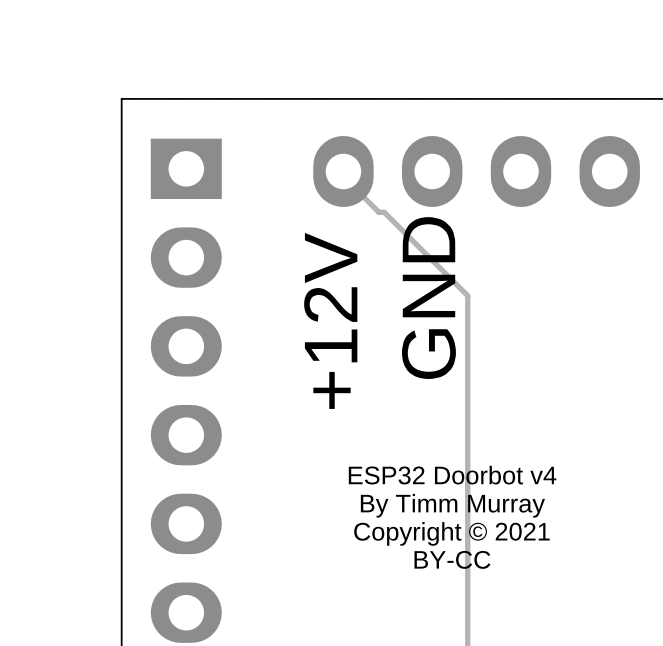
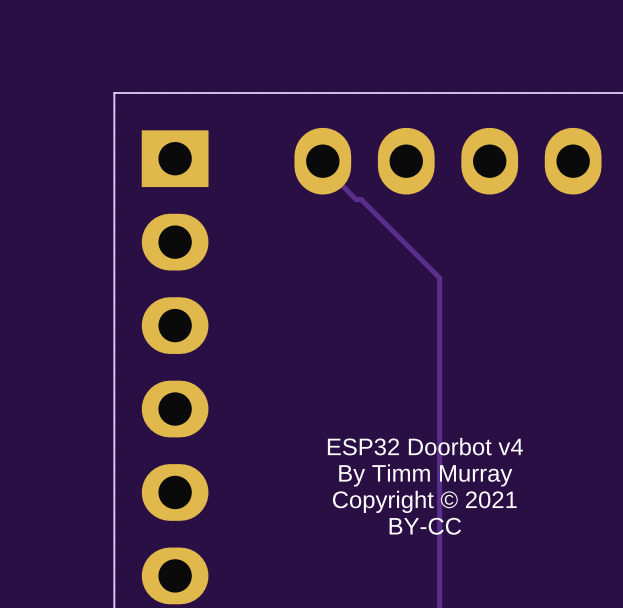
text: GND (428, 298) -> none
text: +12V (330, 320) -> none

